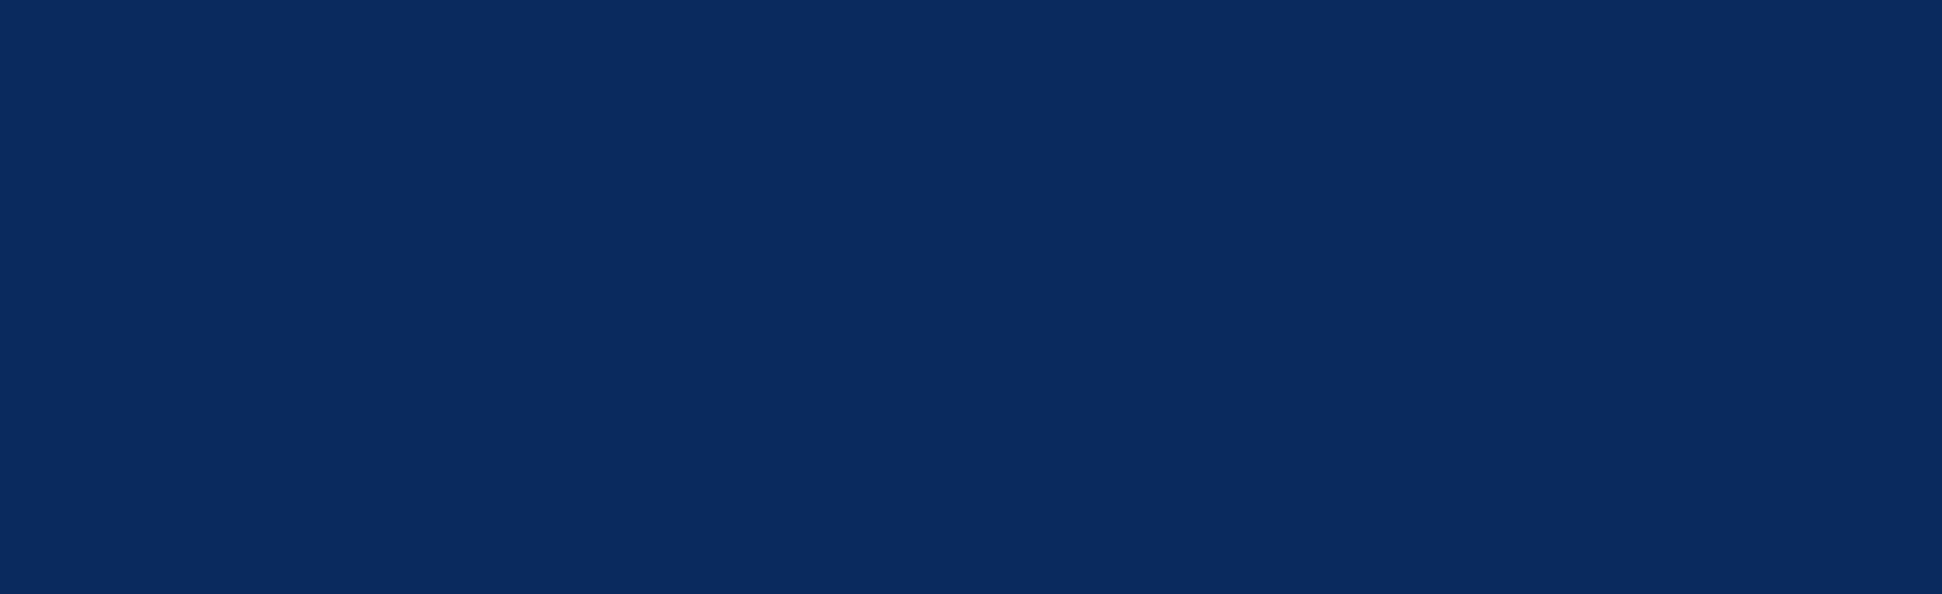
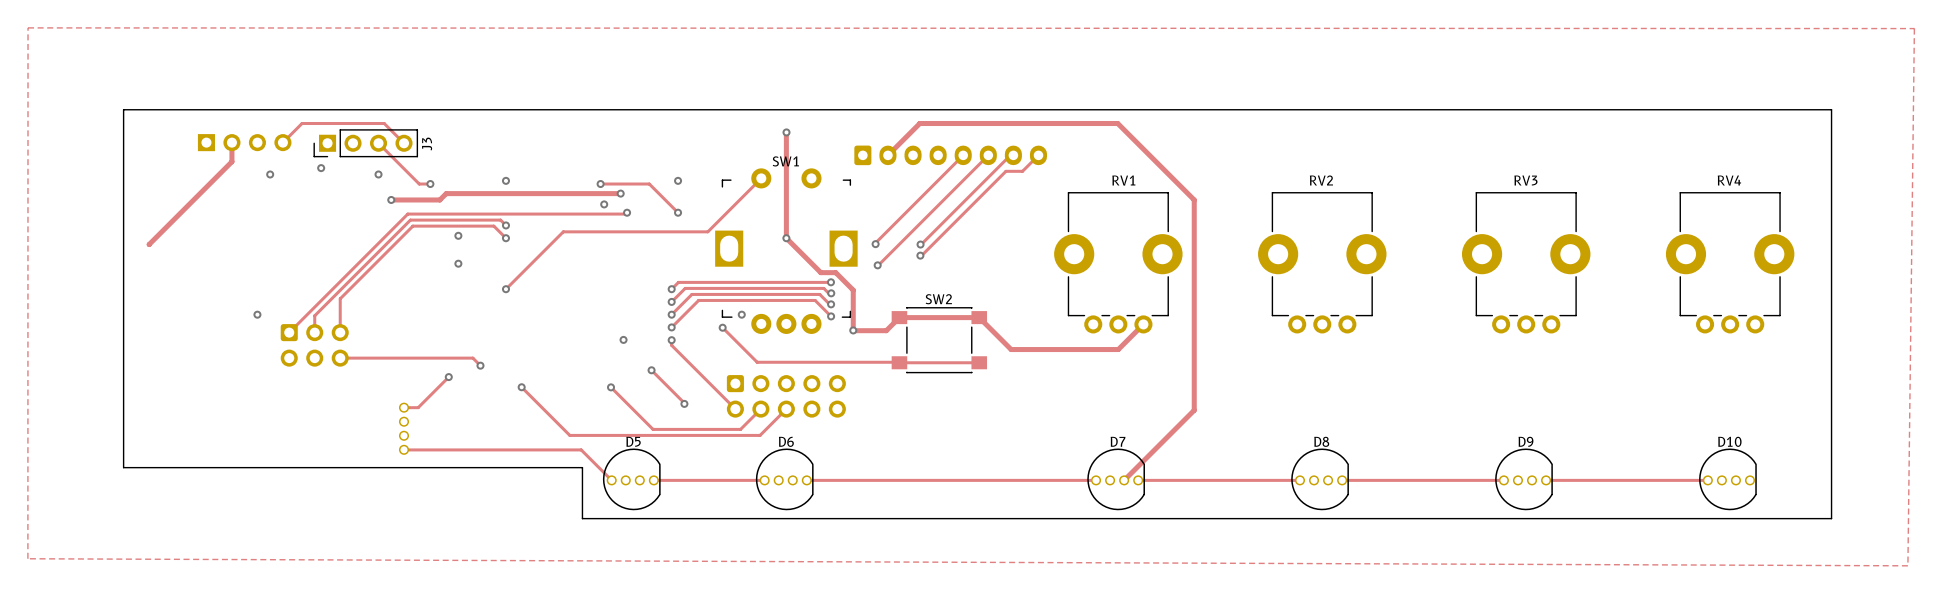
zone outline: none -> (28, 27) (27, 558) (1907, 565) (1914, 28) (28, 27)
board edge: none -> (123, 109) (1831, 109) (1831, 518) (582, 518) (582, 467) (123, 467) (123, 109)
track: none -> (786, 132) (786, 238) (820, 272) (835, 272) (853, 290) (853, 330) (886, 330) (899, 317) (979, 317) (1011, 349) (1118, 349) (1143, 324)
via: none -> (786, 132)
track: none -> (231, 142) (231, 161) (149, 244)
part: none -> (244, 142)
track: none -> (282, 142) (302, 123) (384, 123) (404, 143)
J3: none -> (365, 143)
track: none -> (378, 143) (419, 184) (430, 184)
track: none -> (887, 155) (919, 123) (1117, 123) (1194, 199) (1194, 410) (1124, 480)
part: none -> (950, 155)
track: none -> (963, 155) (875, 244)
track: none -> (988, 155) (877, 265)
track: none -> (1013, 155) (1010, 155) (920, 245)
track: none -> (1038, 155) (1022, 171) (1005, 171) (920, 255)
via: none -> (321, 168)
via: none -> (270, 174)
via: none -> (378, 174)
track: none -> (761, 178) (707, 231) (563, 231) (505, 289)
via: none -> (505, 180)
via: none -> (678, 180)
via: none -> (430, 184)
track: none -> (600, 184) (649, 184) (678, 212)
via: none -> (600, 184)
track: none -> (620, 193) (446, 193) (439, 199) (391, 199)
via: none -> (620, 193)
via: none -> (391, 199)
via: none -> (604, 204)
track: none -> (627, 212) (407, 214) (289, 332)
via: none -> (627, 212)
via: none -> (678, 212)
track: none -> (505, 225) (500, 220) (410, 220) (314, 315) (314, 332)
via: none -> (505, 225)
via: none -> (458, 235)
track: none -> (505, 238) (493, 226) (412, 226) (340, 298) (340, 332)
via: none -> (505, 238)
via: none -> (786, 238)
via: none -> (875, 244)
via: none -> (920, 244)
SW1: none -> (786, 251)
via: none -> (920, 255)
RV1: none -> (1118, 262)
RV2: none -> (1322, 262)
RV3: none -> (1526, 262)
RV4: none -> (1730, 262)
via: none -> (458, 263)
via: none -> (877, 265)
track: none -> (830, 282) (678, 282) (671, 289)
via: none -> (830, 282)
via: none -> (505, 289)
via: none -> (671, 289)
track: none -> (831, 293) (823, 288) (685, 288) (671, 301)
via: none -> (831, 293)
via: none -> (671, 301)
track: none -> (831, 304) (819, 294) (691, 294) (671, 314)
via: none -> (831, 304)
via: none -> (257, 314)
via: none -> (671, 314)
via: none -> (741, 314)
track: none -> (831, 316) (815, 300) (698, 300) (671, 327)
via: none -> (831, 316)
via: none -> (671, 327)
track: none -> (722, 327) (757, 362) (979, 362)
via: none -> (722, 327)
via: none -> (853, 330)
via: none -> (623, 339)
track: none -> (671, 340) (671, 345) (735, 409)
via: none -> (671, 340)
SW2: none -> (939, 340)
part: none -> (314, 345)
track: none -> (340, 358) (472, 358) (480, 365)
via: none -> (480, 365)
track: none -> (651, 370) (684, 403)
via: none -> (651, 370)
track: none -> (448, 377) (418, 407) (404, 407)
via: none -> (448, 377)
track: none -> (521, 387) (569, 435) (760, 435) (786, 409)
via: none -> (521, 387)
track: none -> (611, 387) (653, 429) (740, 429) (760, 409)
via: none -> (611, 387)
part: none -> (786, 396)
via: none -> (684, 403)
part: none -> (404, 428)
track: none -> (404, 449) (581, 449) (611, 480)
D5: none -> (631, 479)
D6: none -> (784, 479)
D7: none -> (1116, 479)
D8: none -> (1320, 479)
D9: none -> (1523, 479)
D10: none -> (1727, 479)
track: none -> (653, 480) (764, 480)
track: none -> (806, 480) (1096, 480)
track: none -> (1138, 480) (1299, 480)
track: none -> (1342, 480) (1503, 480)
track: none -> (1546, 480) (1707, 480)

